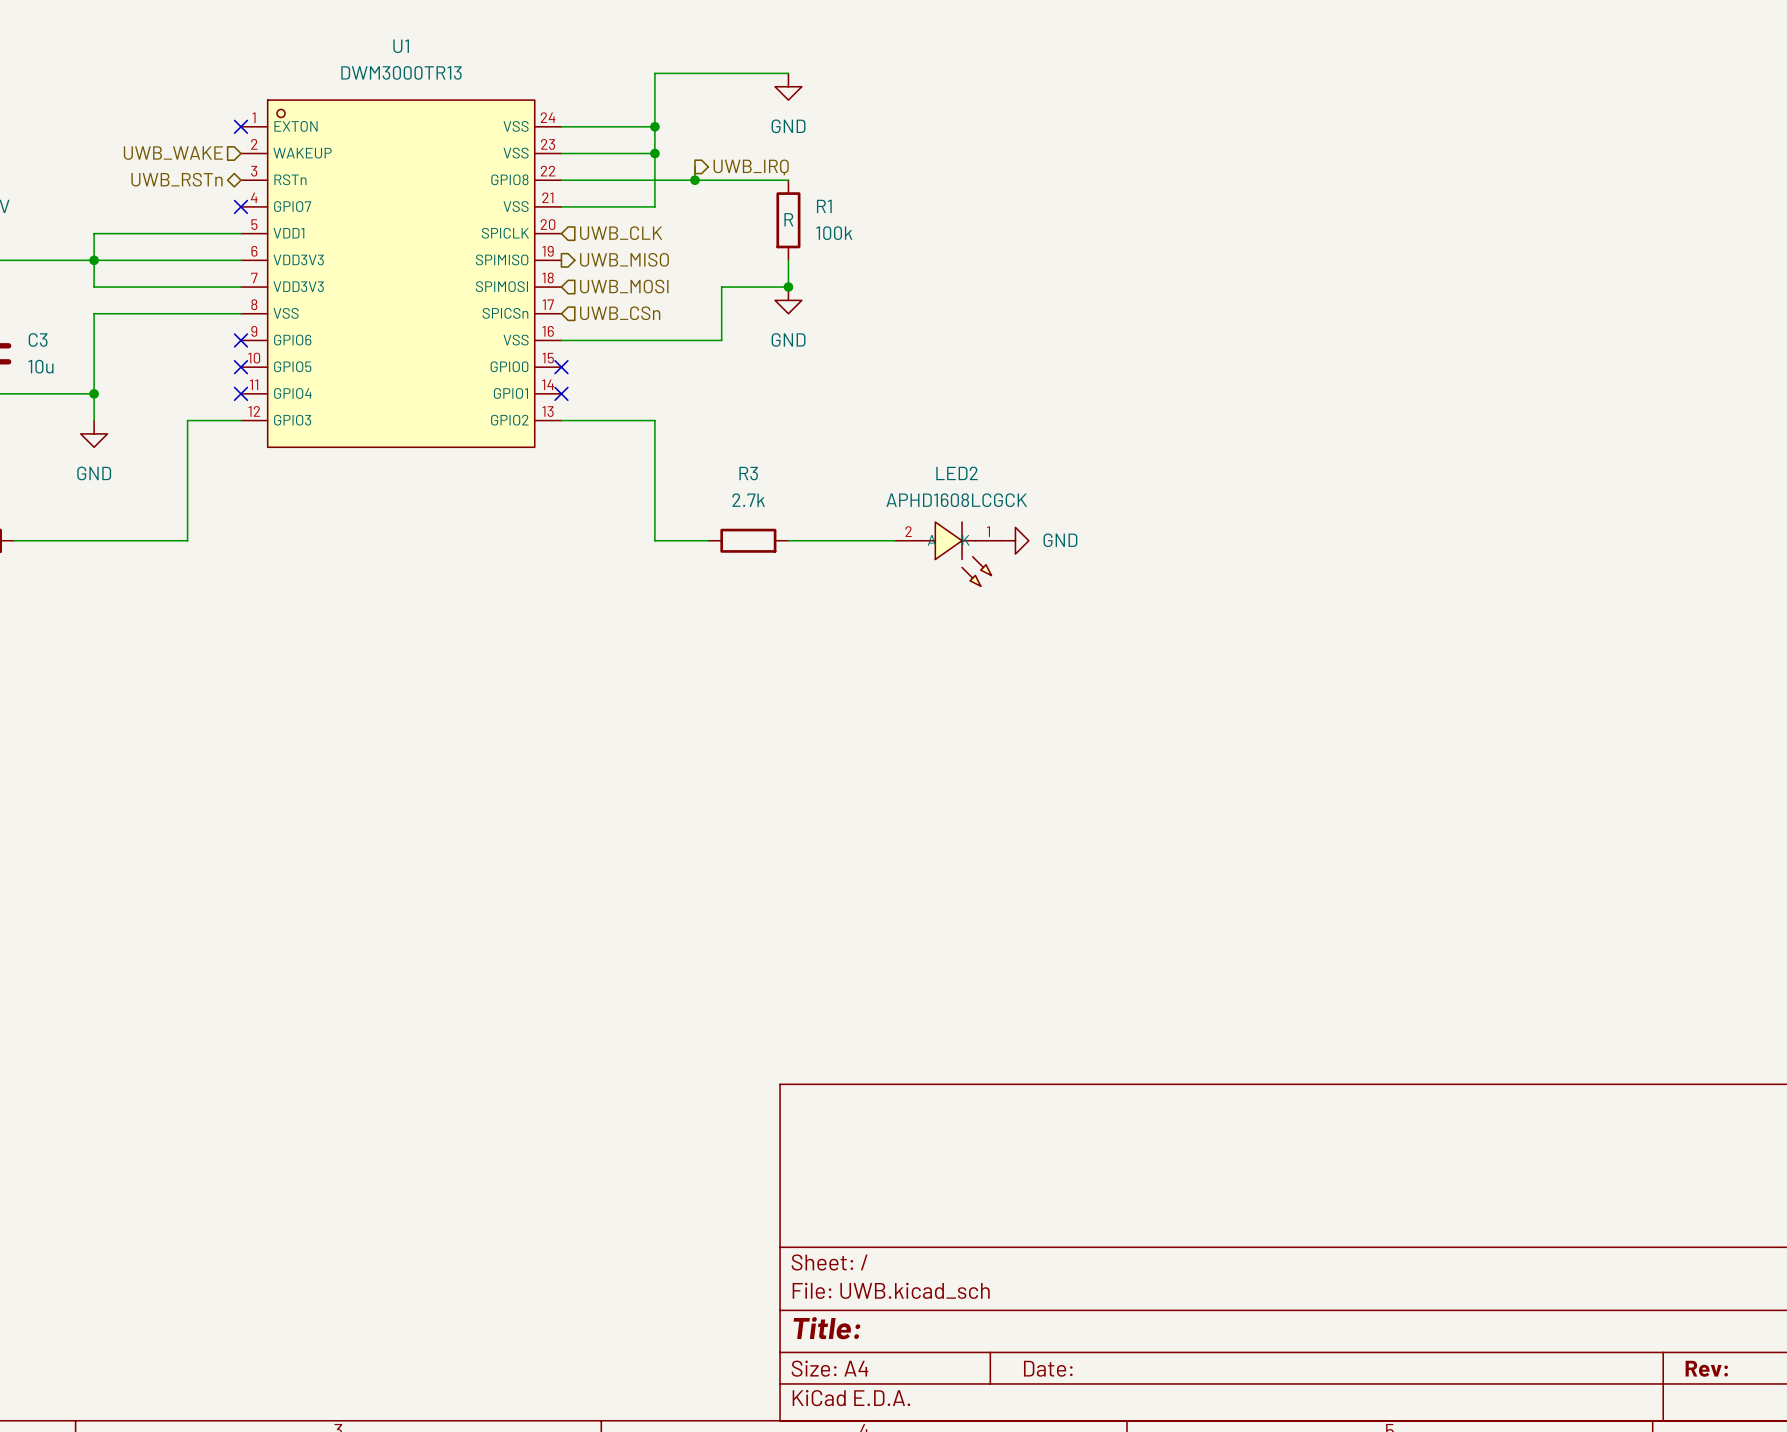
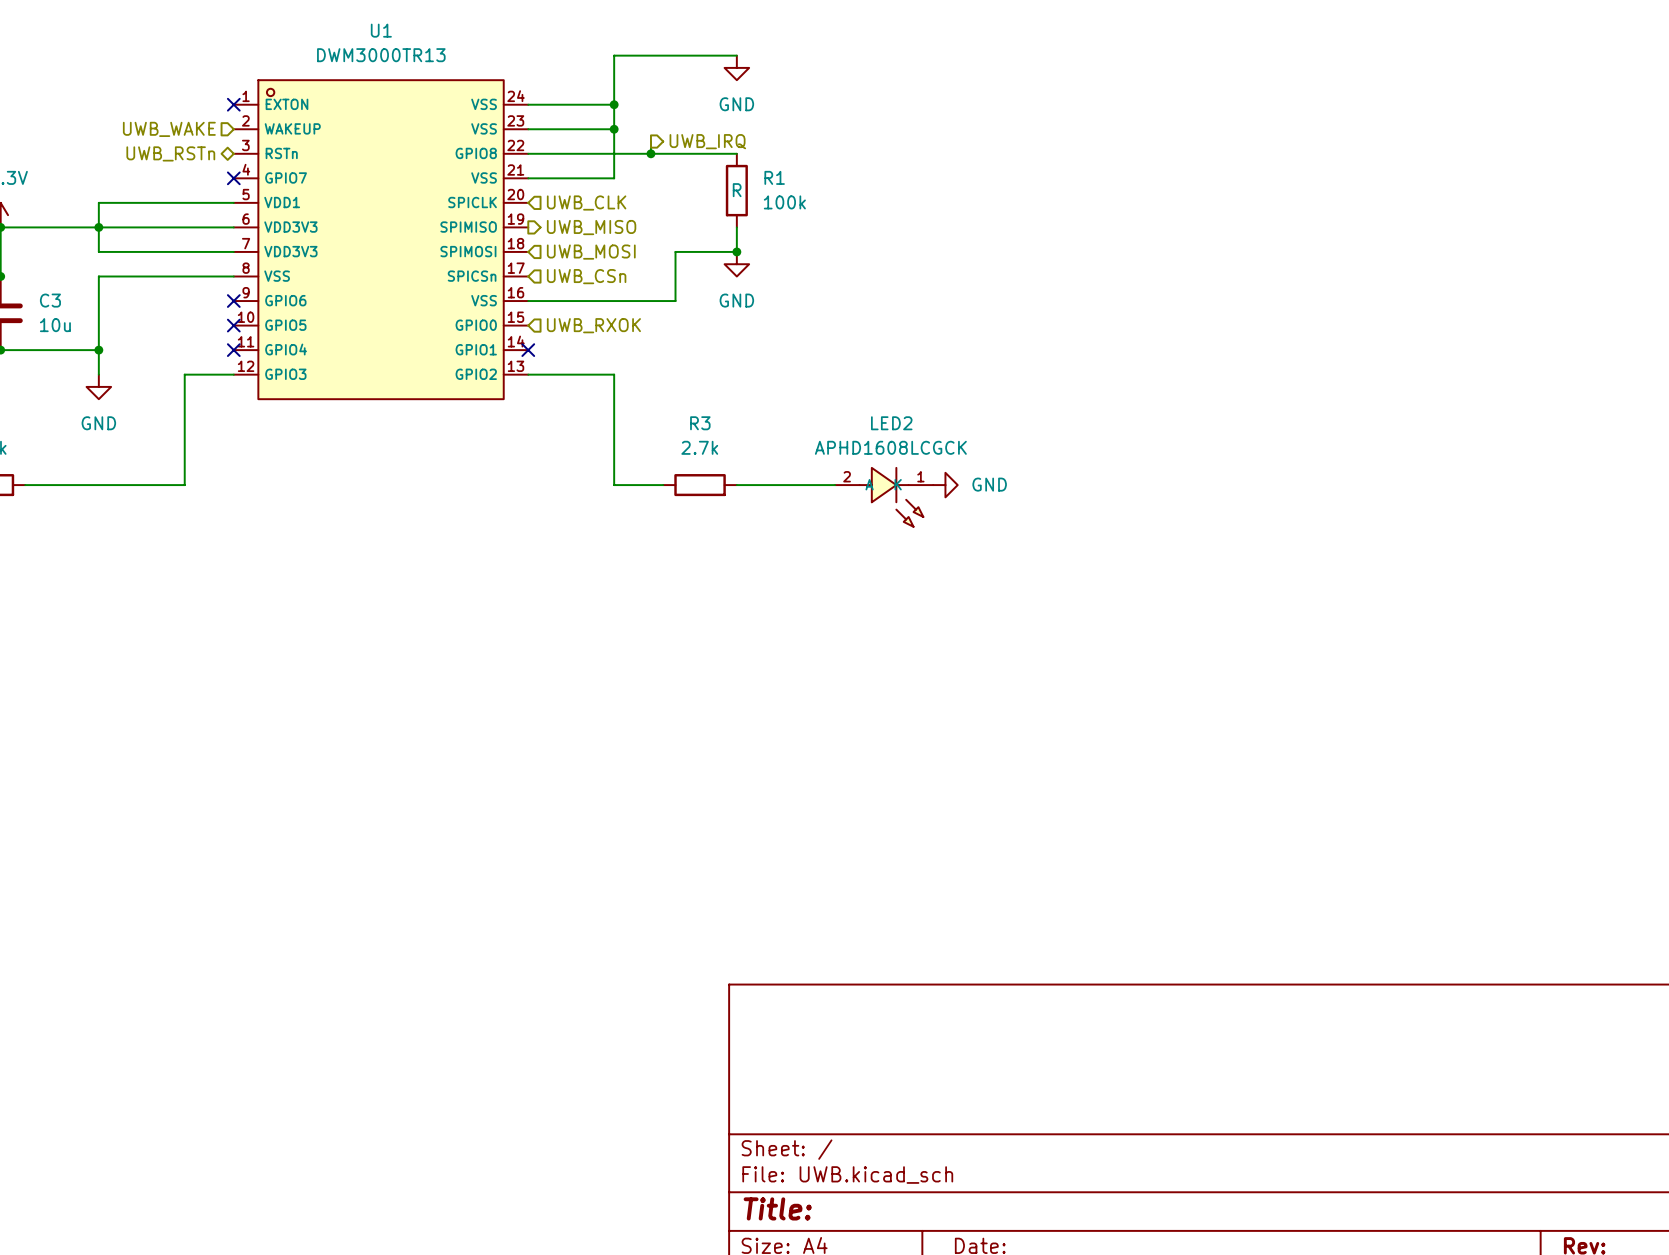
hierarchical label: none -> UWB_RXOK (593, 325)
no-connect mark: (561, 367) -> none

